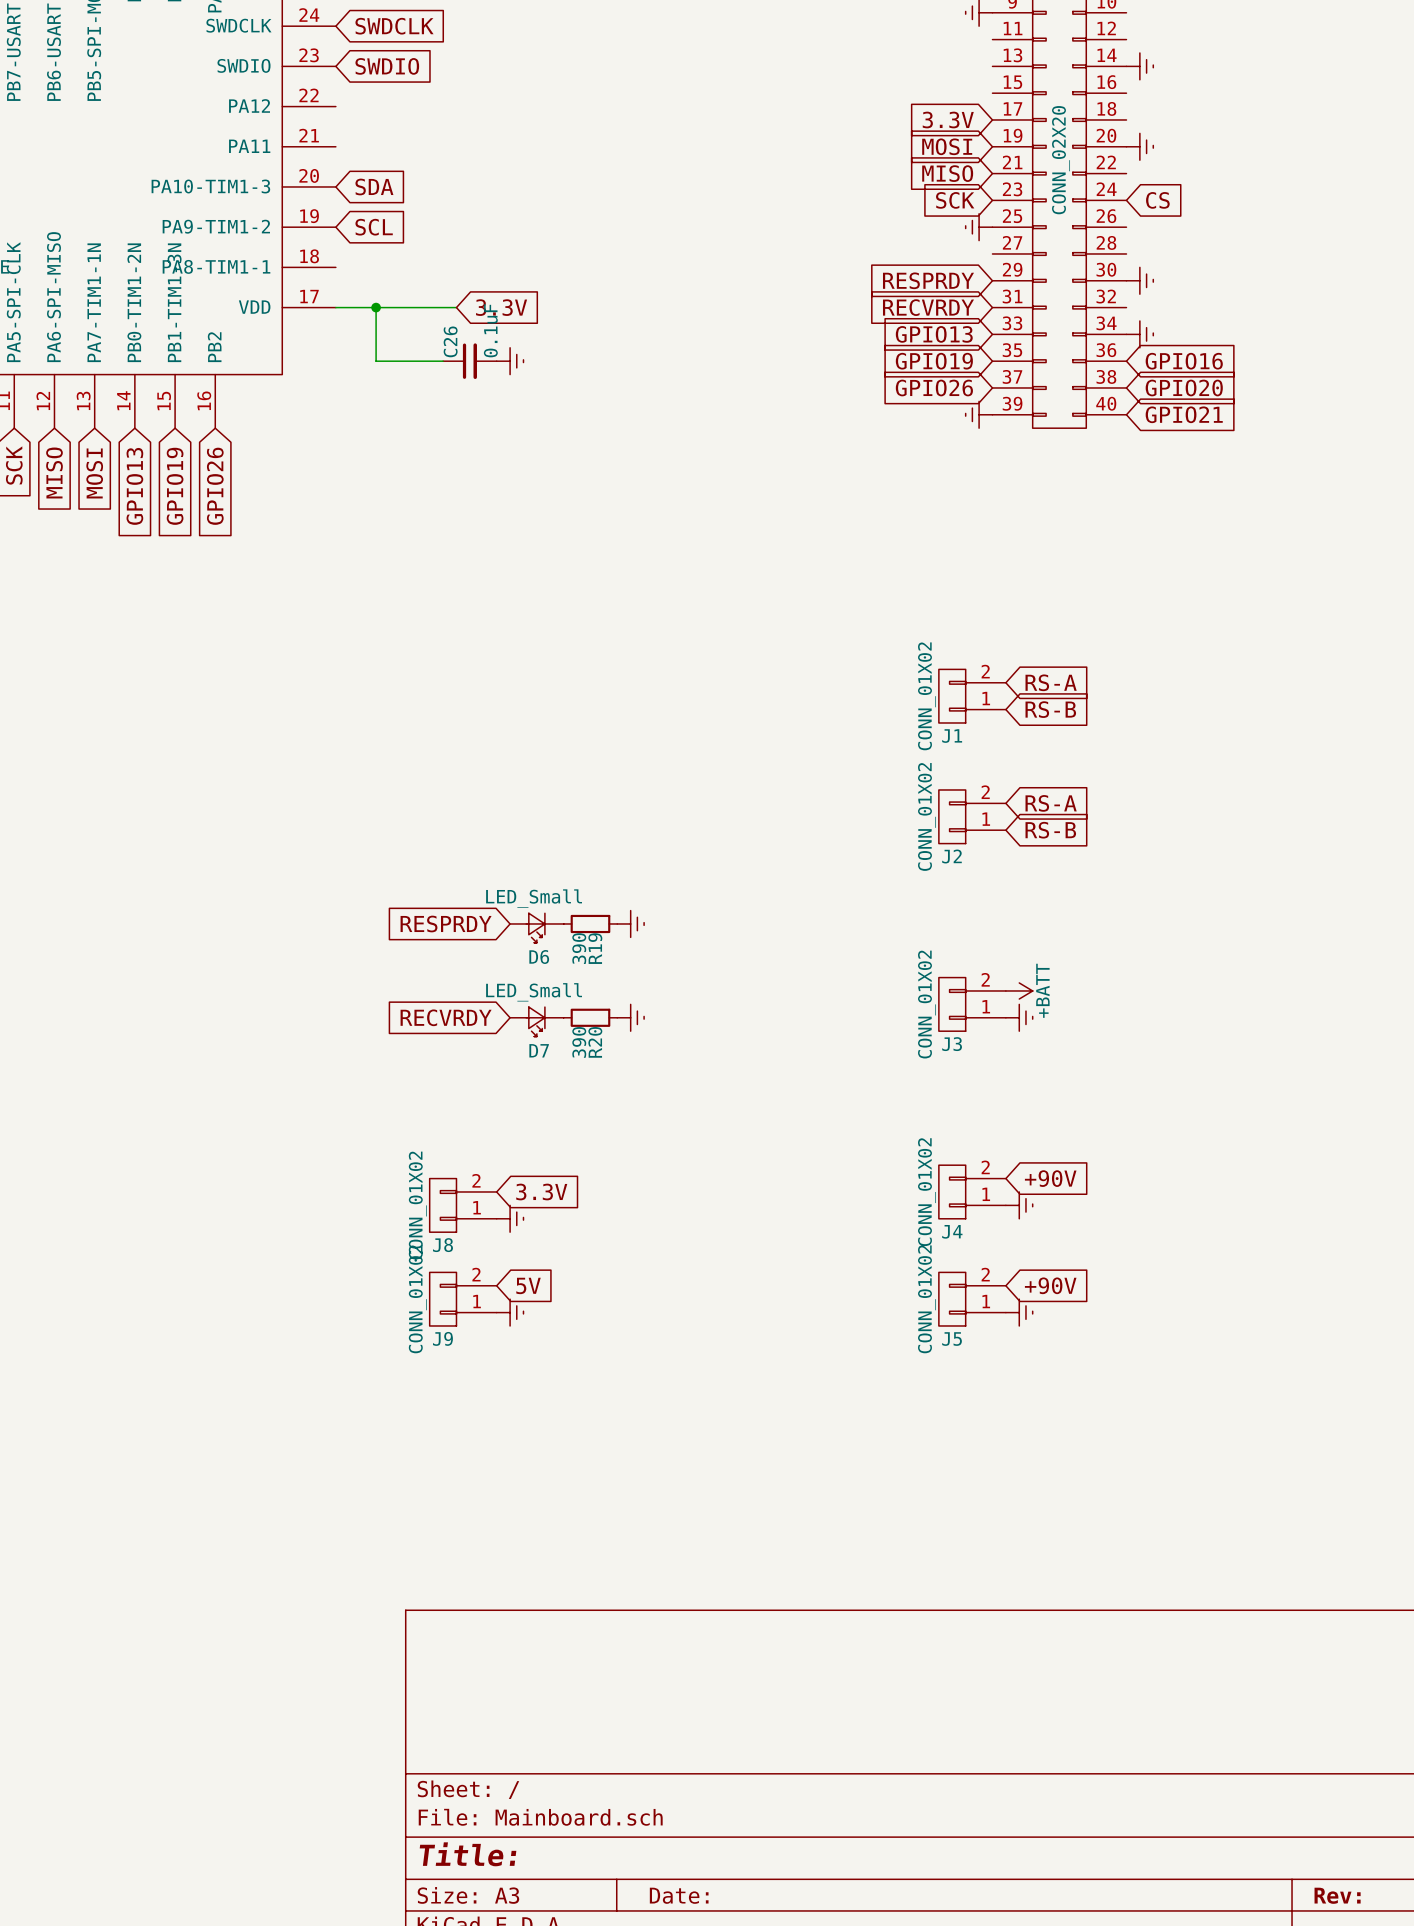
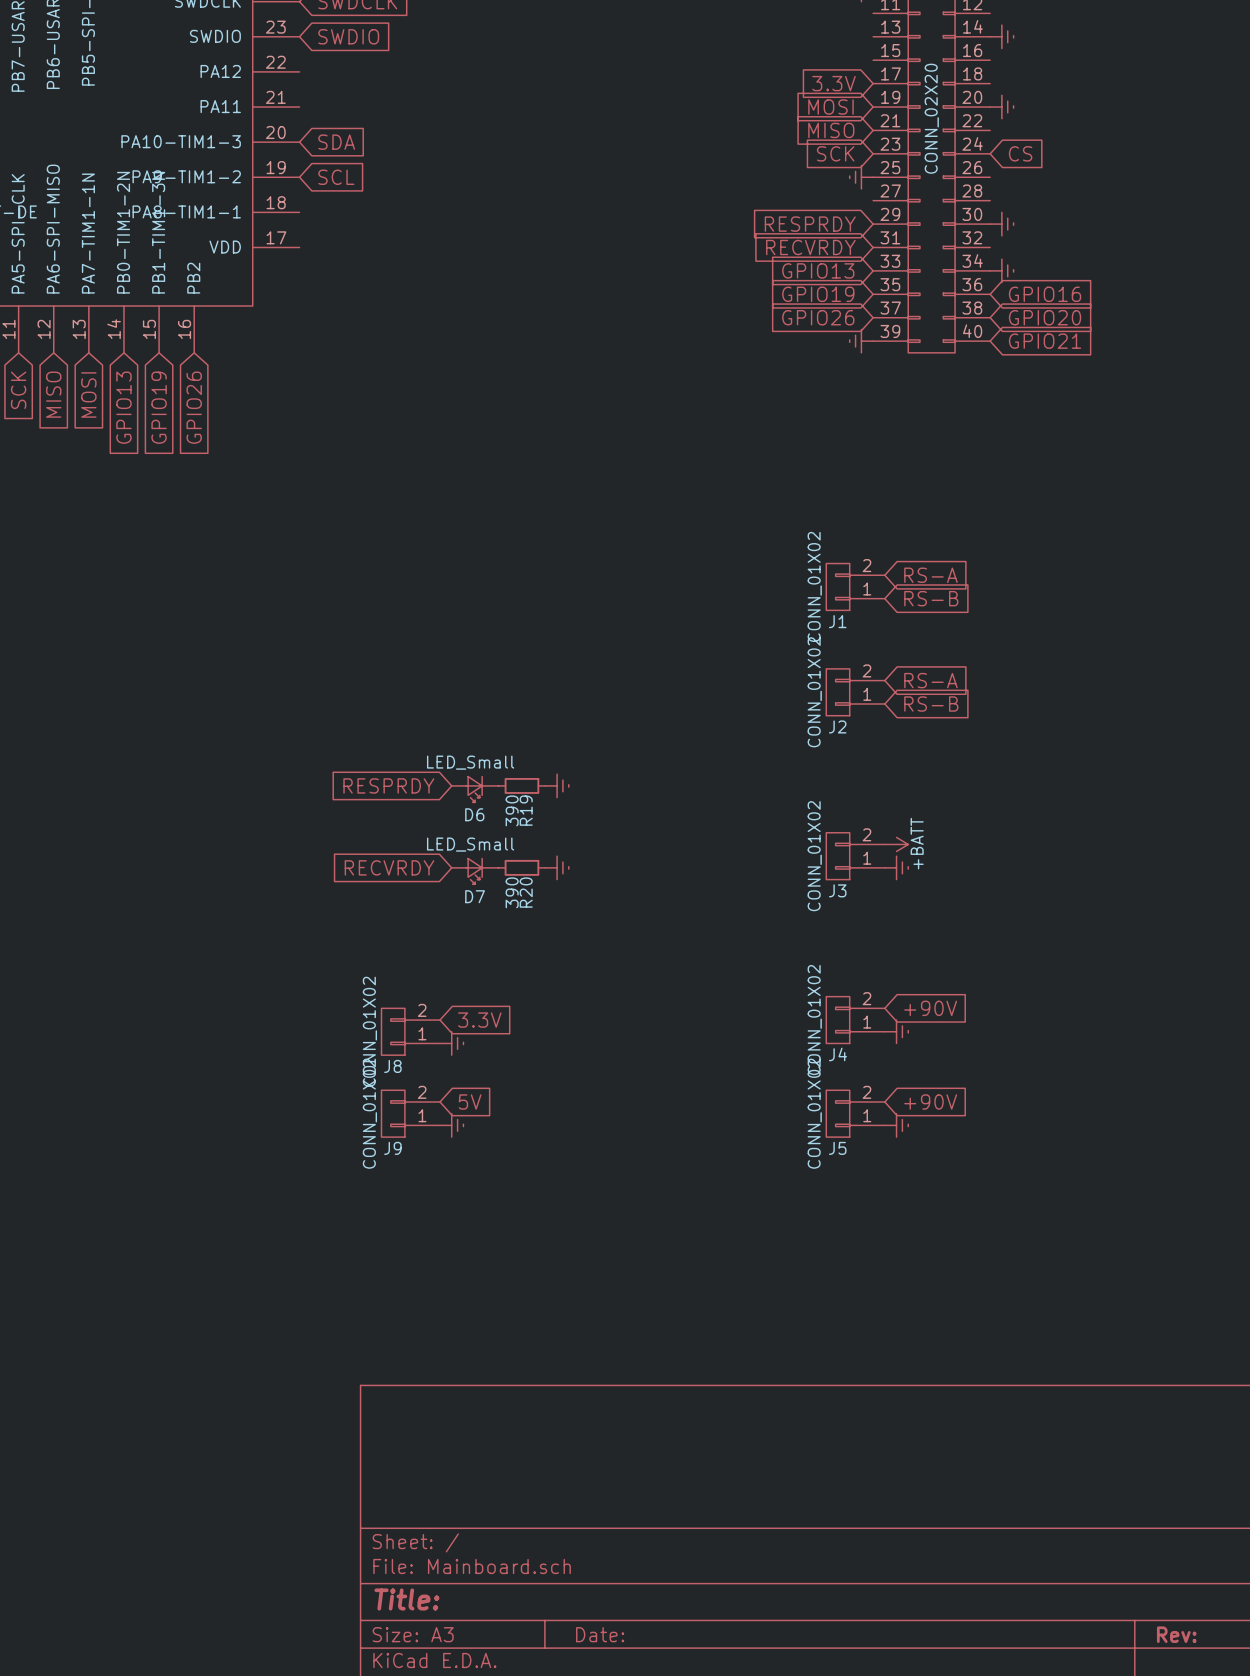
wire: (335, 307) (456, 307) -> none
wire: (376, 307) (376, 361) (443, 361) -> none
junction: (376, 307) -> none
global label: 3.3V (501, 307) -> none
C26: 0.1uF (469, 361) -> none
power symbol: (510, 361) -> none

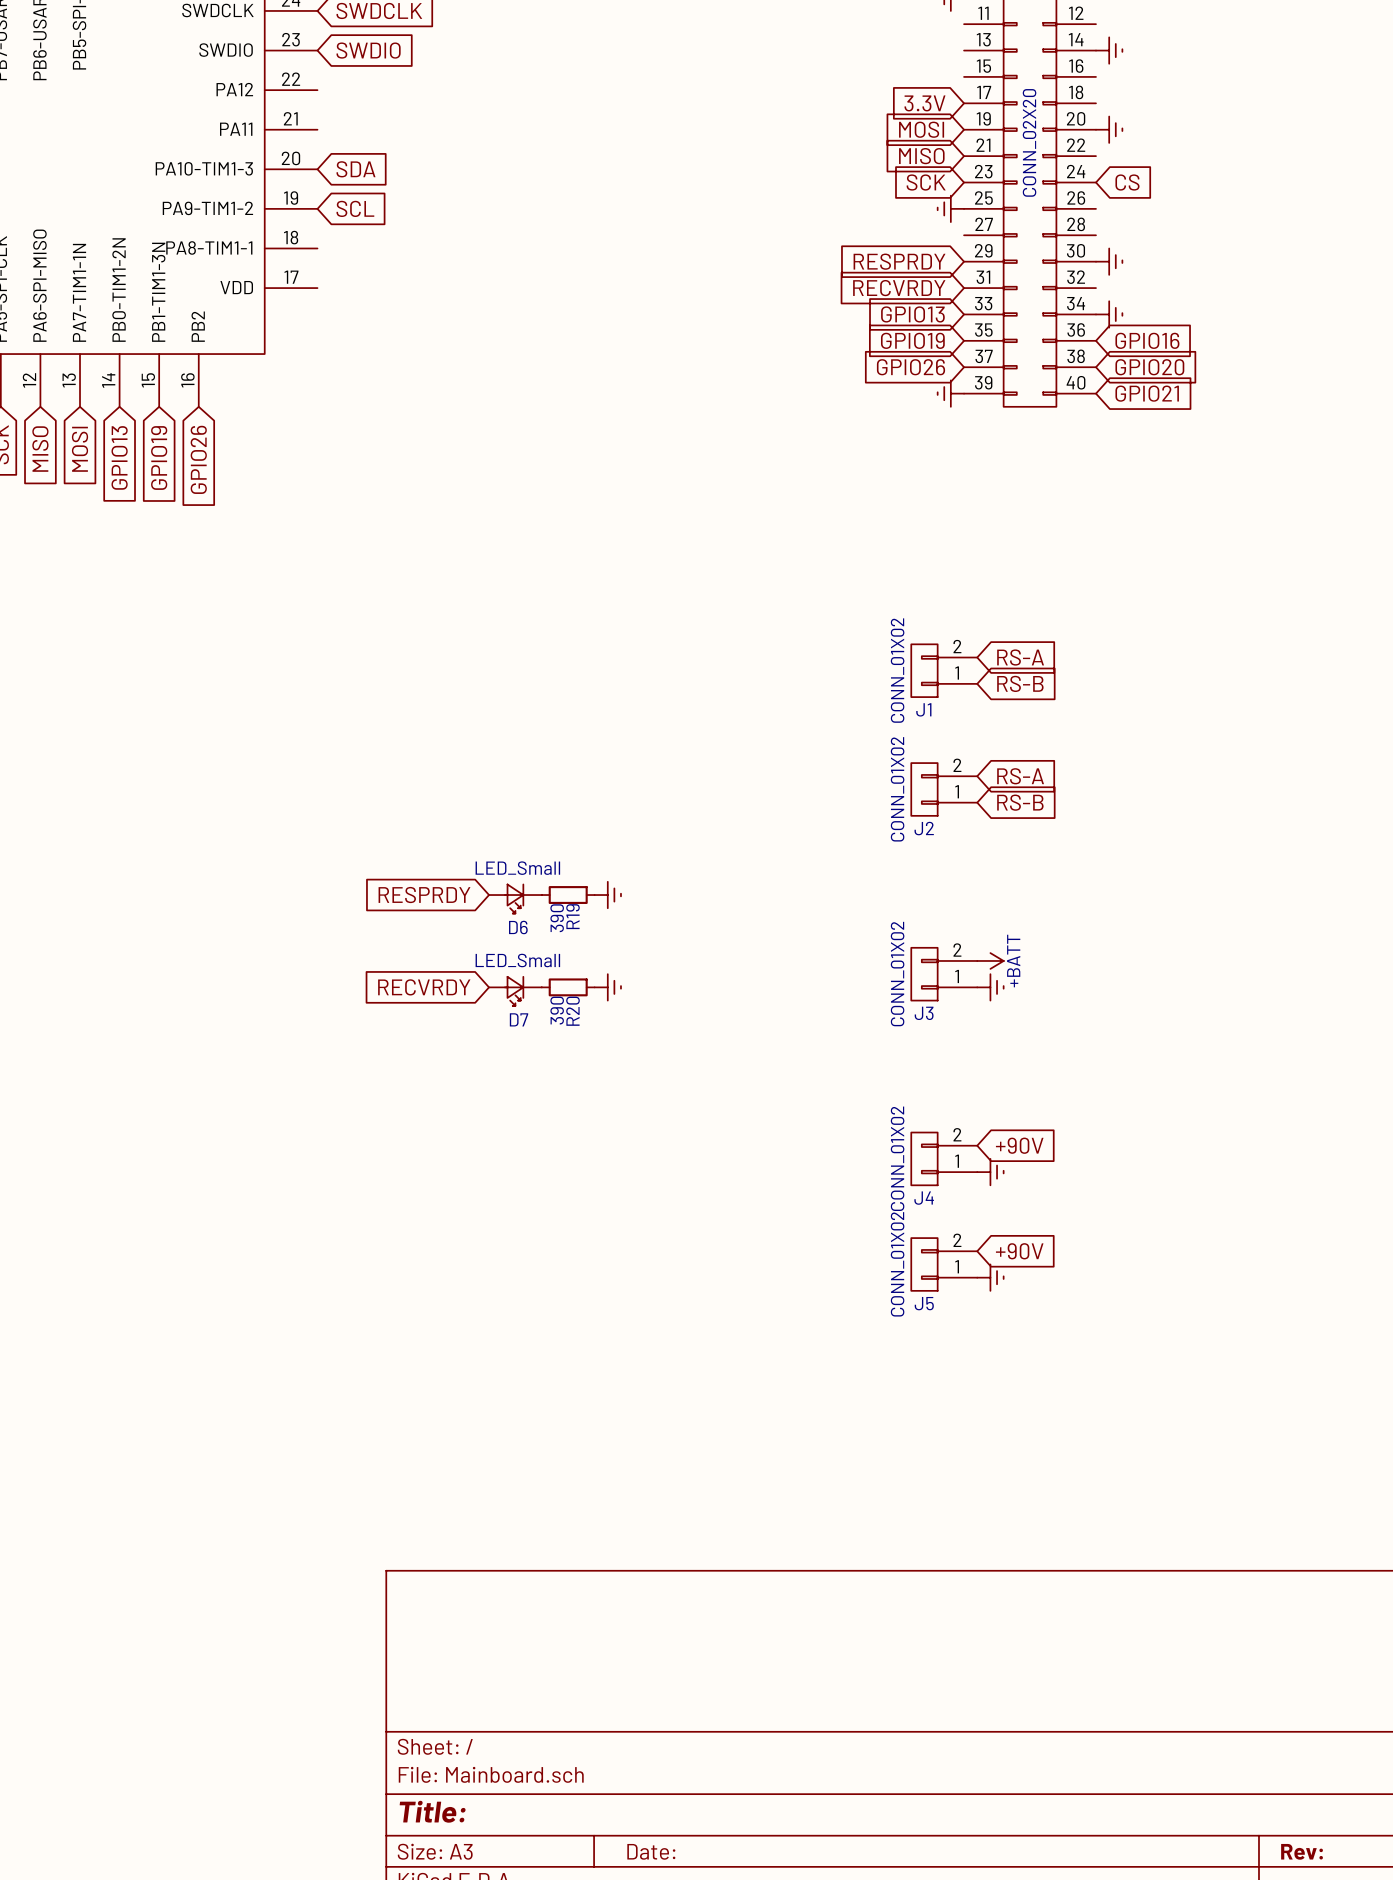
global label: 3.3V (479, 1020) -> none
J8: CONN_01X02 (410, 1031) -> none
power symbol: (451, 1043) -> none
global label: 5V (470, 1101) -> none
J9: CONN_01X02 (410, 1113) -> none
power symbol: (451, 1125) -> none

